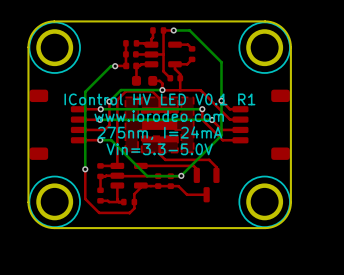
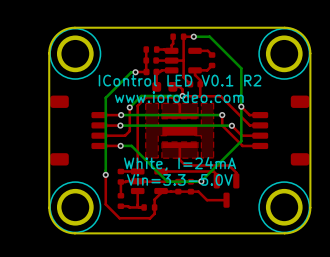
text: none -> IControl LED V0.1 R2 (180, 80)
text: IControl HV LED V0.1 R1 (159, 99) -> www.iorodeo.com (179, 97)
text: www.iorodeo.com (159, 116) -> none
text: 275nm, I=24mA (159, 133) -> none
text: Vin=3.3-5.0V (159, 149) -> White, I=24mA (180, 163)
text: none -> Vin=3.3-5.0V (179, 179)

